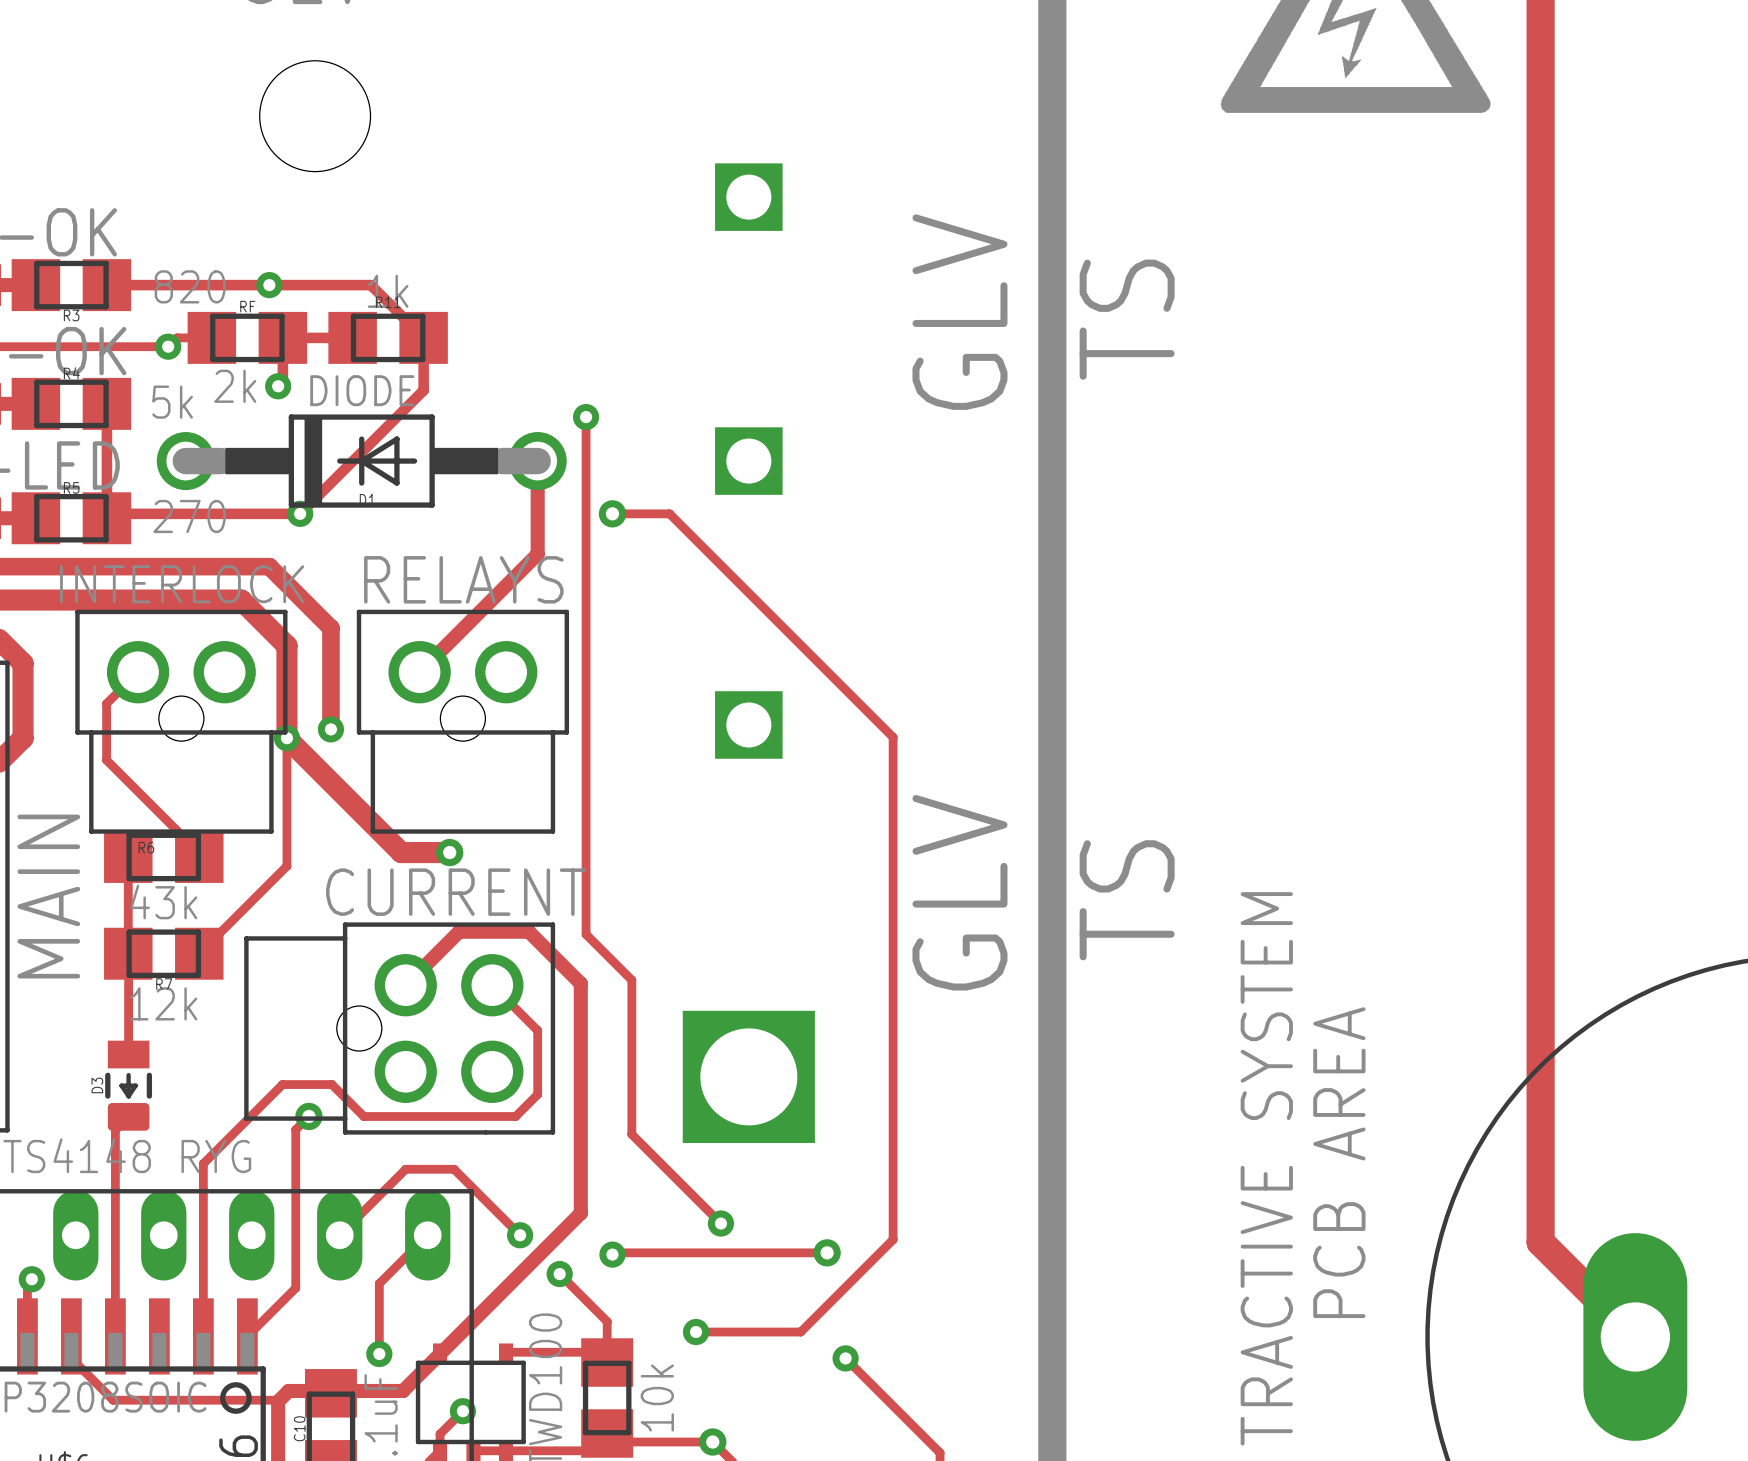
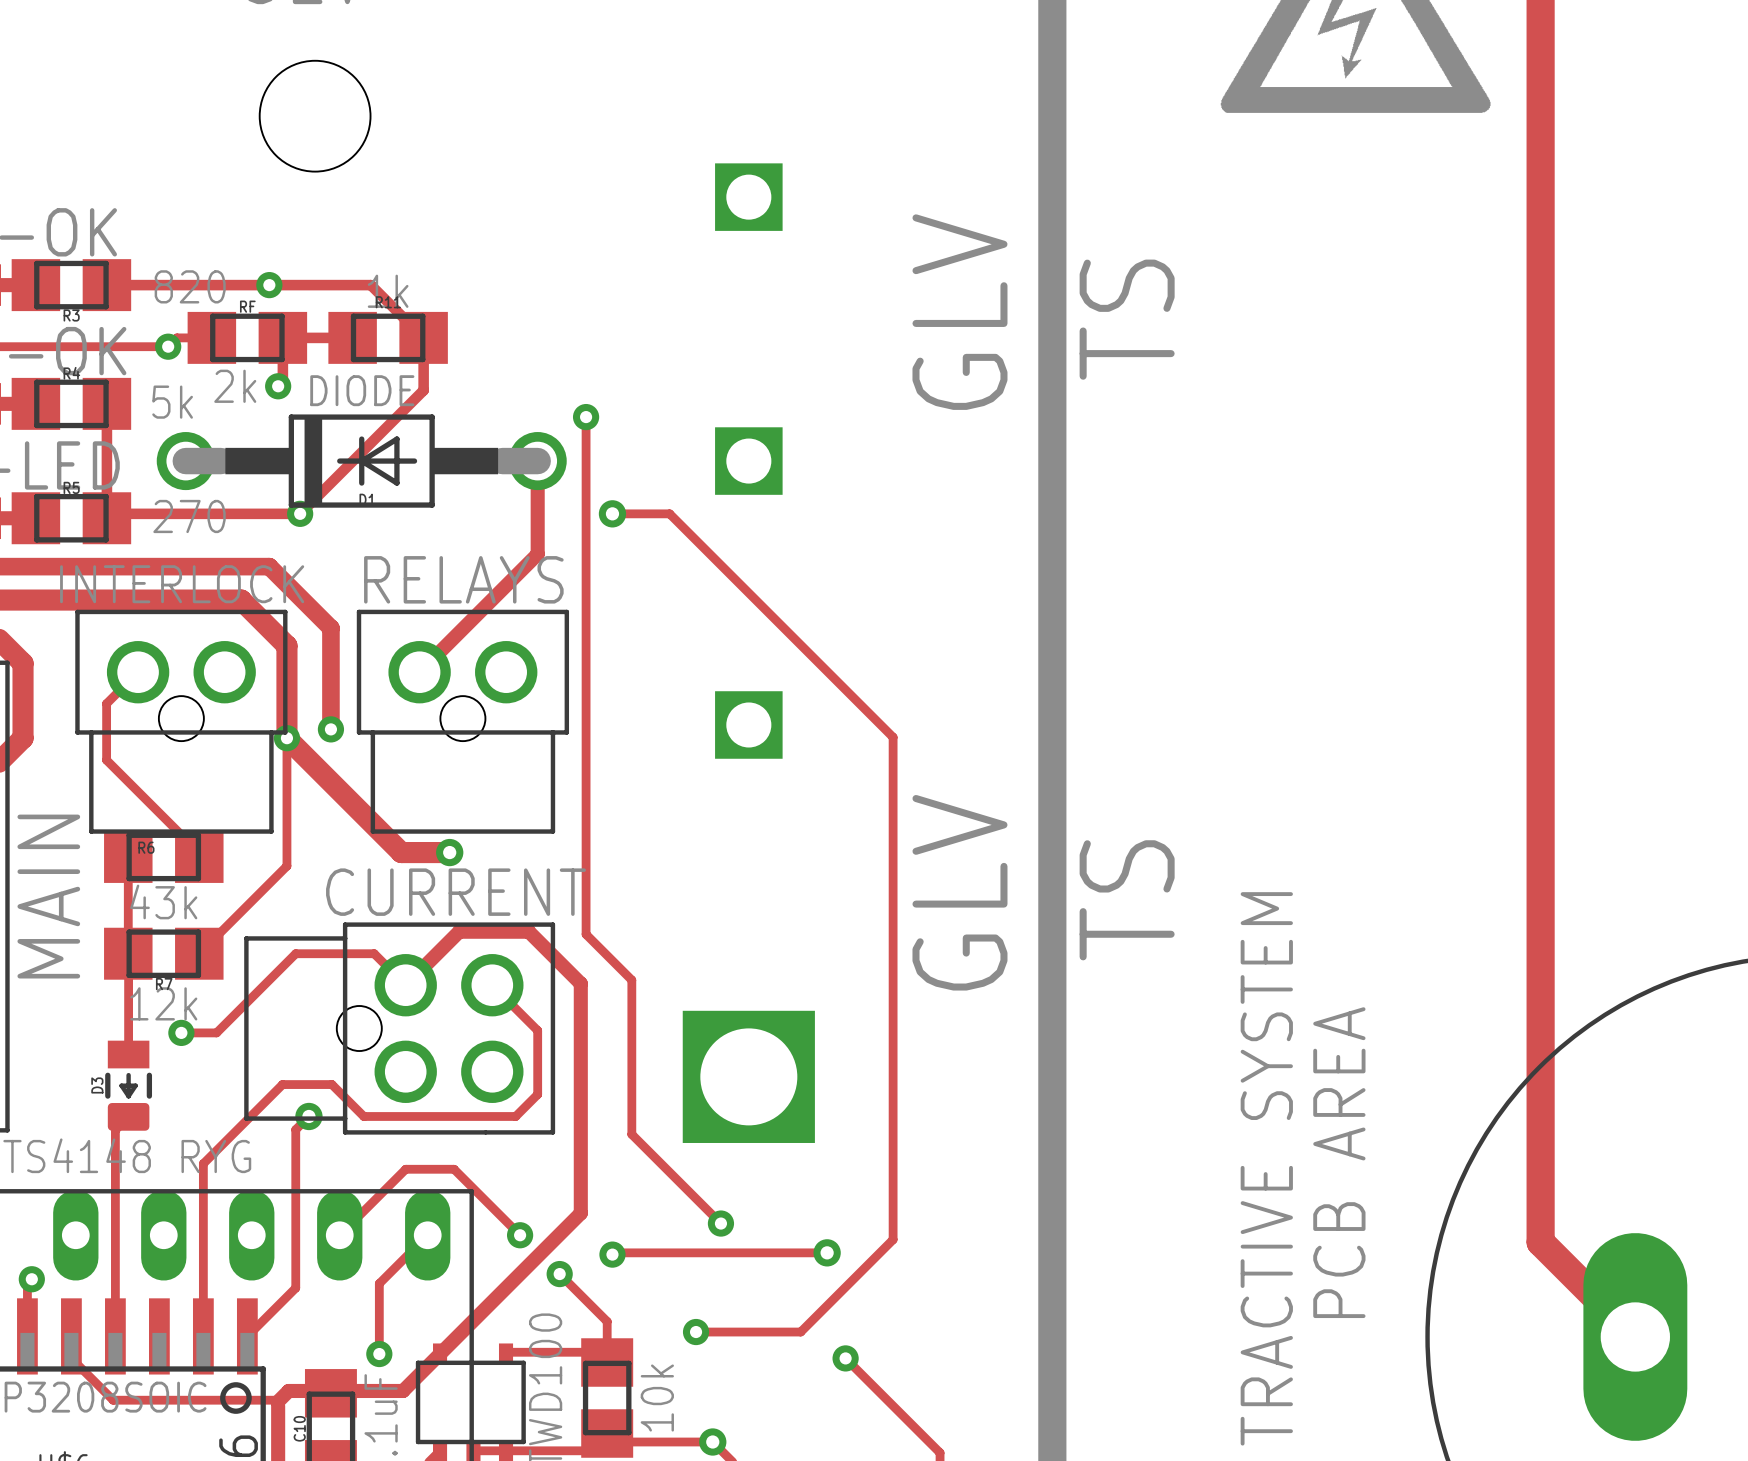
track: none -> (405, 985) (374, 953) (295, 953) (216, 1032) (181, 1032)
via: none -> (181, 1032)
track: (462, 1411) (440, 1434) (440, 1450) -> none
via: (462, 1411) -> none

